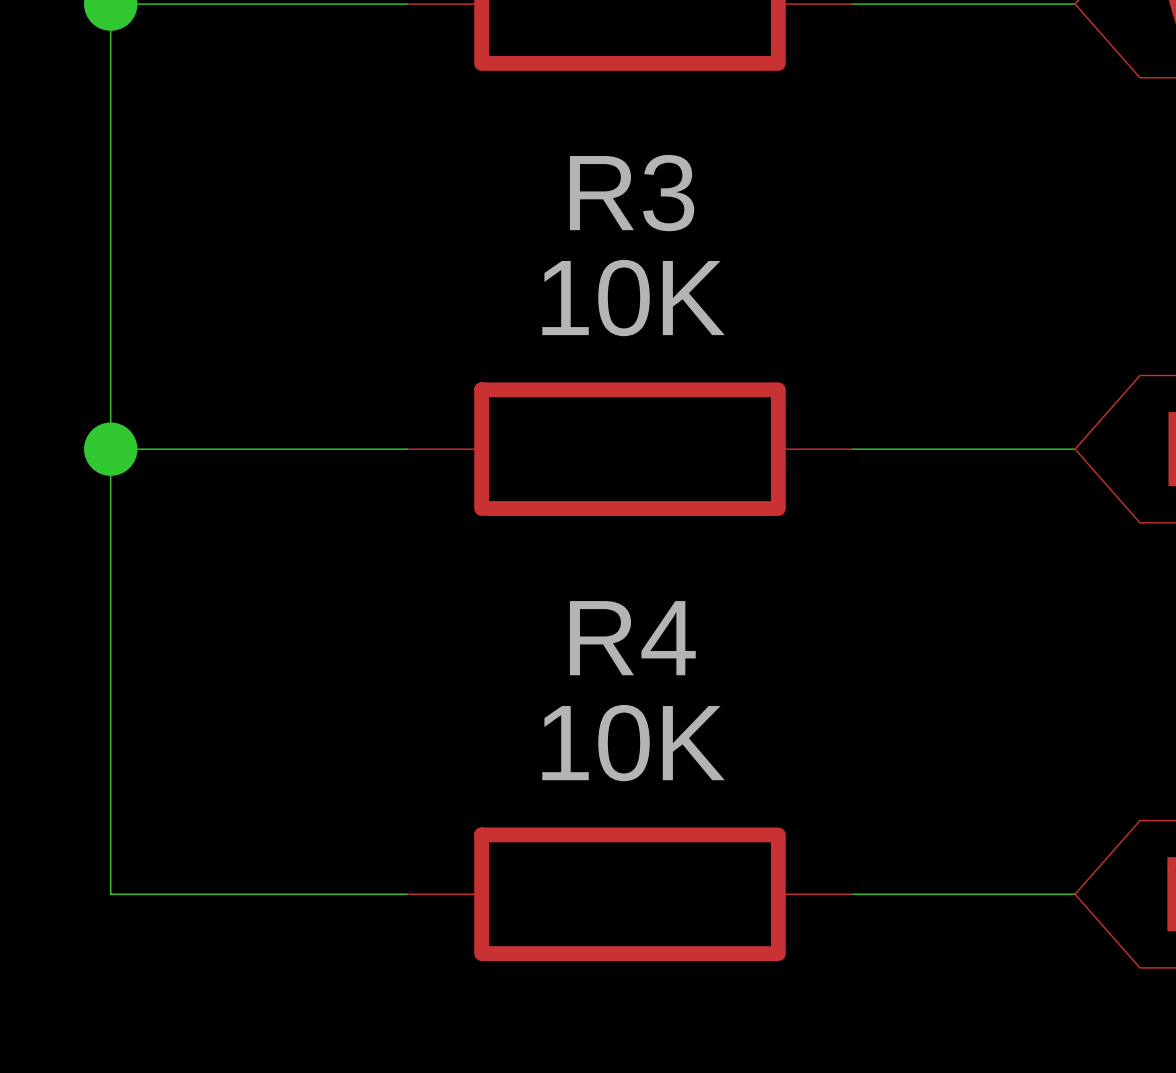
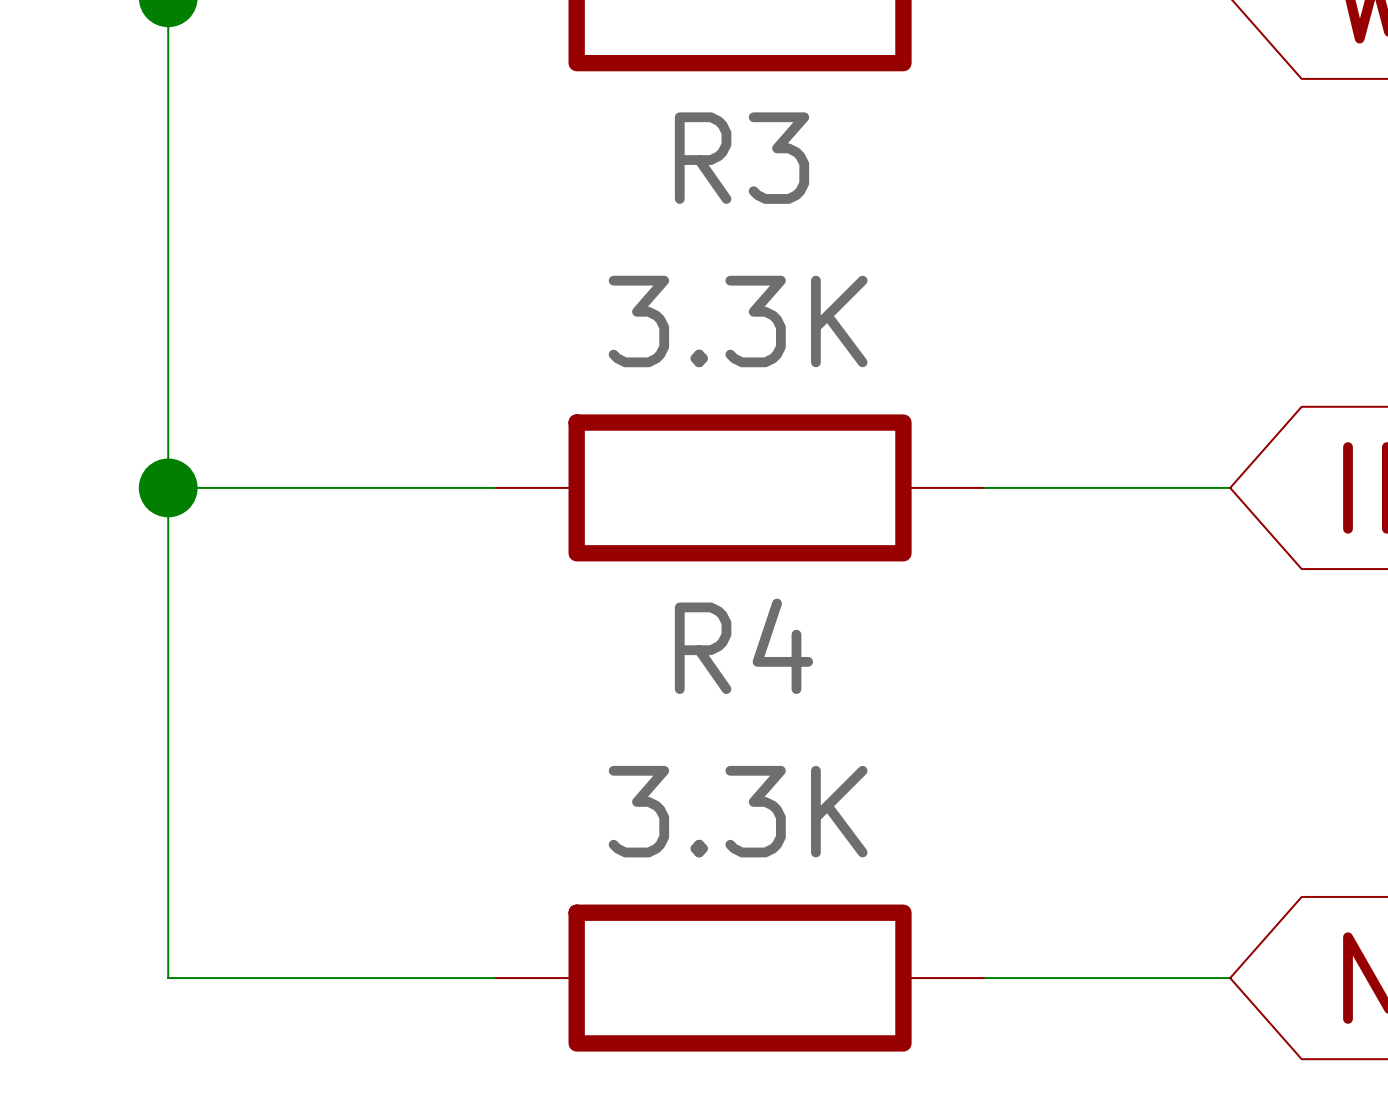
R3 name position: R3 (632, 193) -> R3 (742, 158)
R3 value: 10K (633, 298) -> 3.3K (738, 321)
R4 name position: R4 (632, 638) -> R4 (743, 646)
R4 value: 10K (633, 743) -> 3.3K (738, 811)

